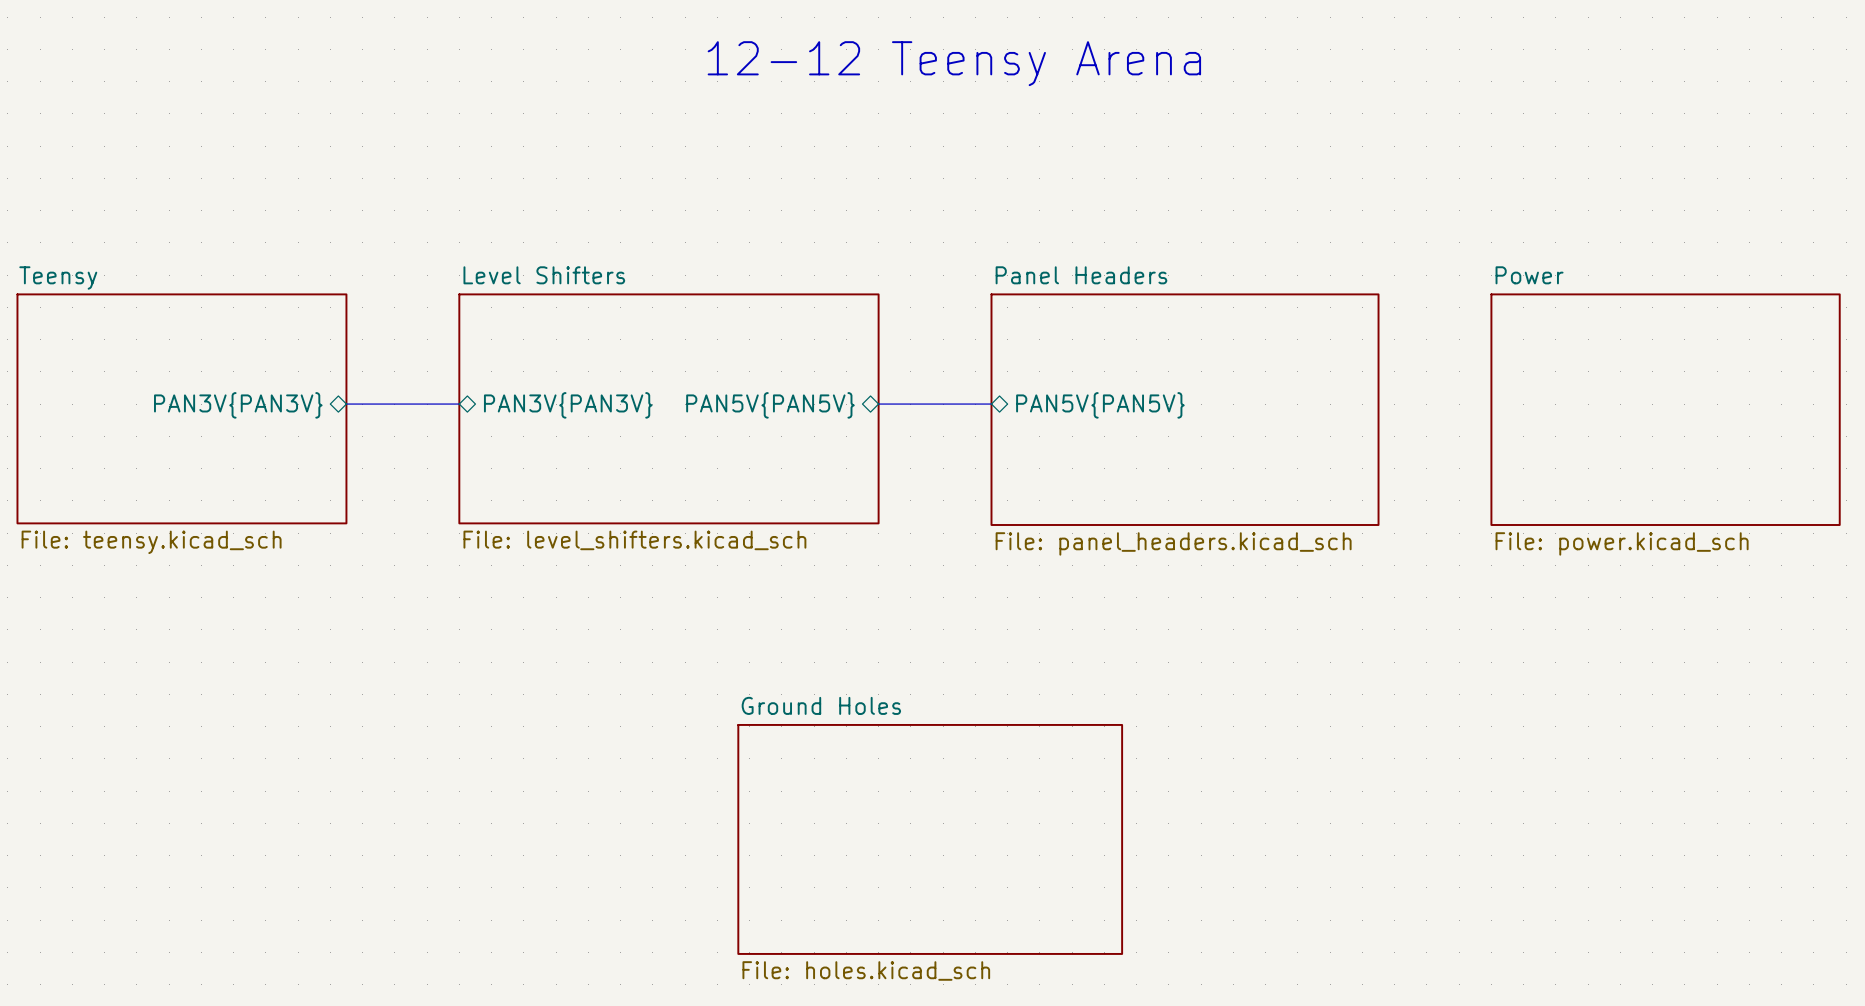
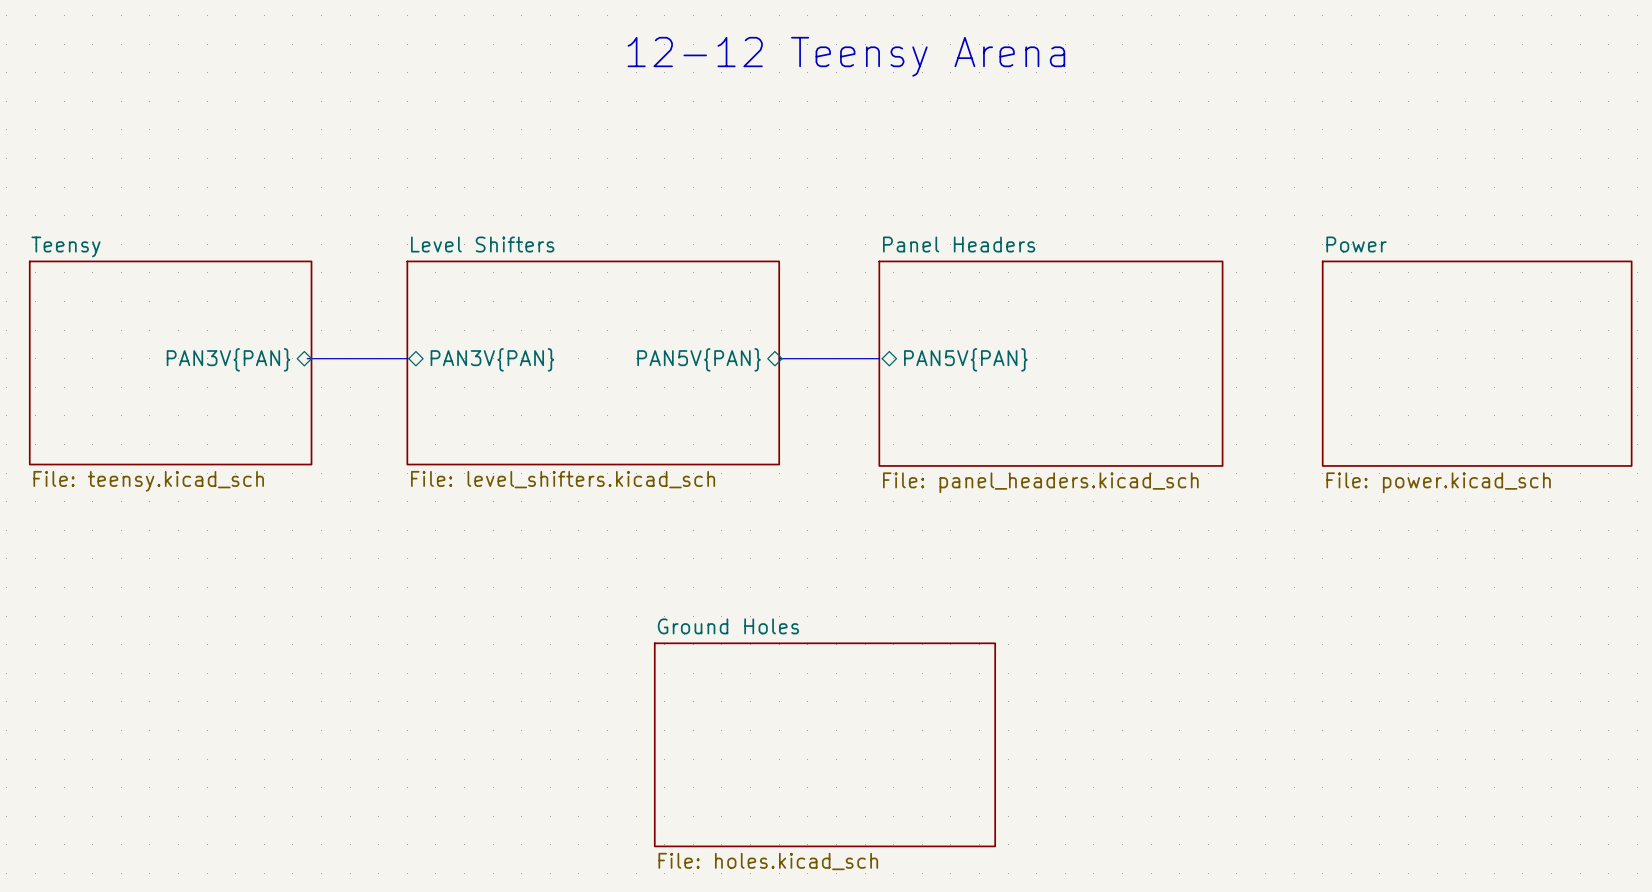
sheet Teensy shape: [16, 293, 348, 525] -> [28, 260, 313, 466]
sheet pin: PAN3V{PAN3V} (238, 405) -> PAN3V{PAN} (228, 359)
sheet pin: PAN3V{PAN3V} (568, 405) -> PAN3V{PAN} (492, 359)
sheet pin: PAN5V{PAN5V} (770, 405) -> PAN5V{PAN} (699, 359)
sheet pin: PAN5V{PAN5V} (1100, 405) -> PAN5V{PAN} (965, 359)

